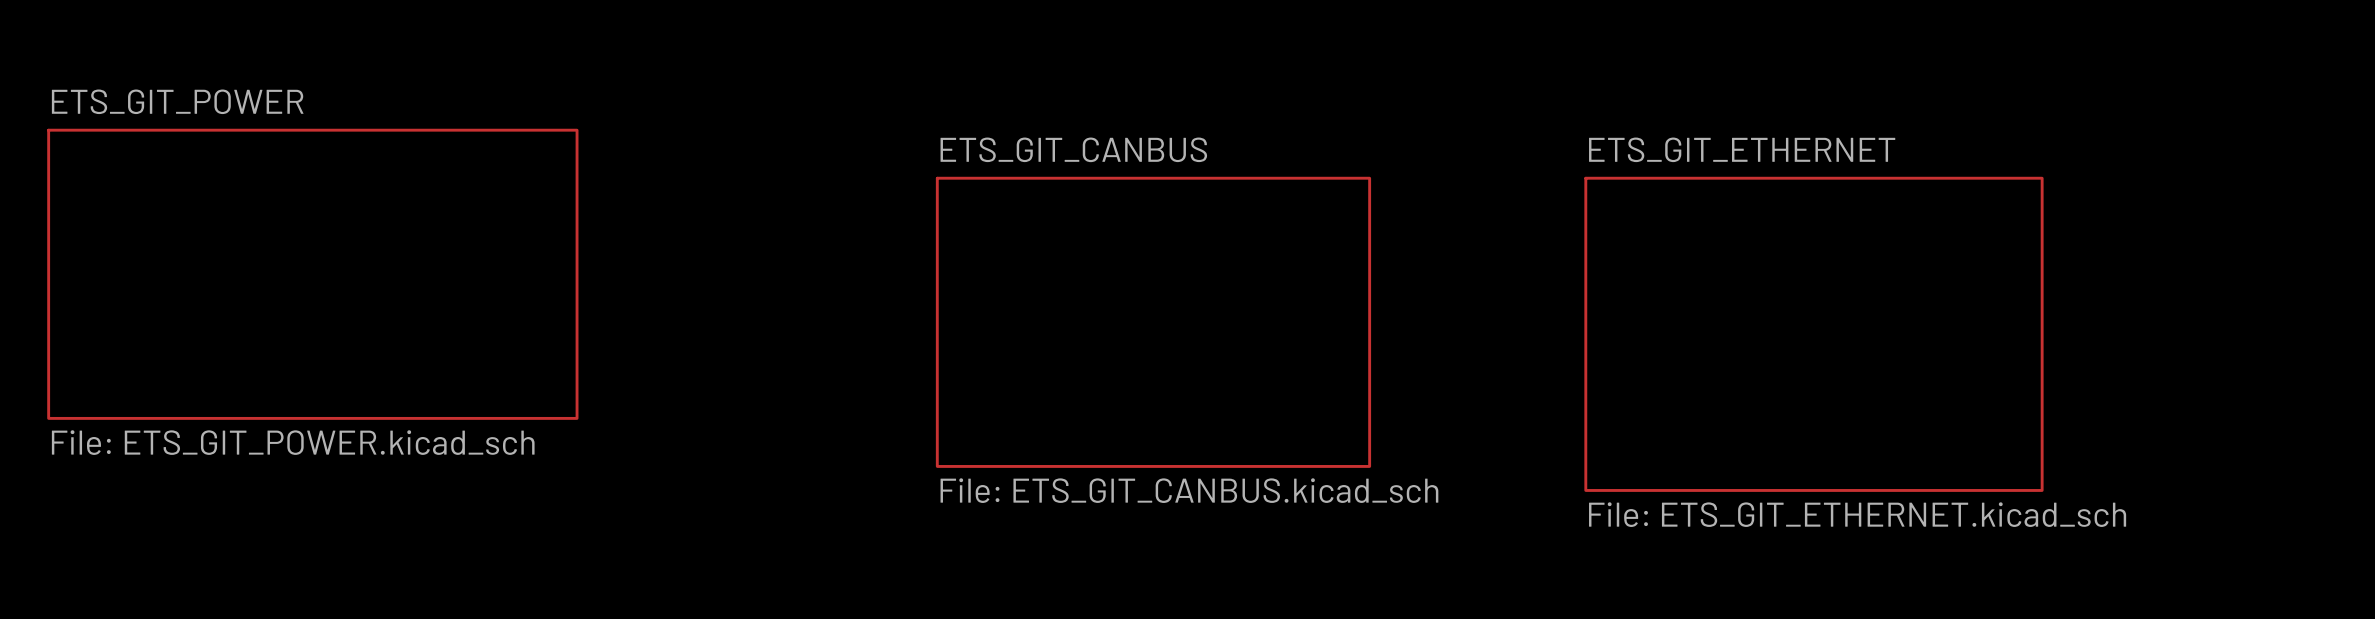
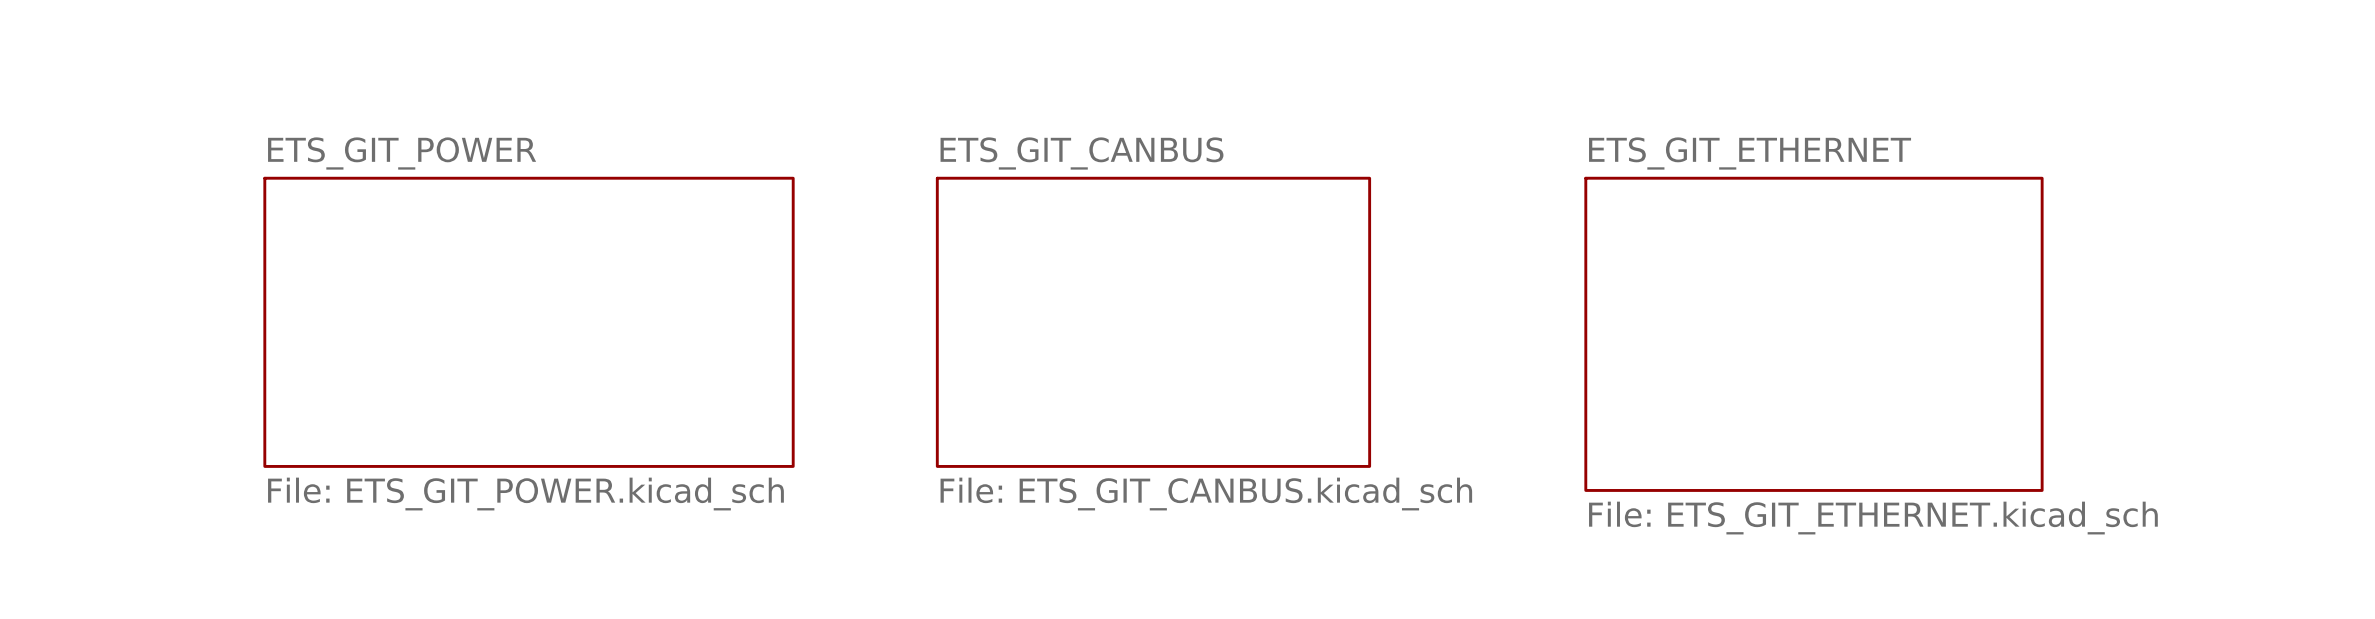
sheet ETS_GIT_POWER position: (312, 274) -> (529, 322)

